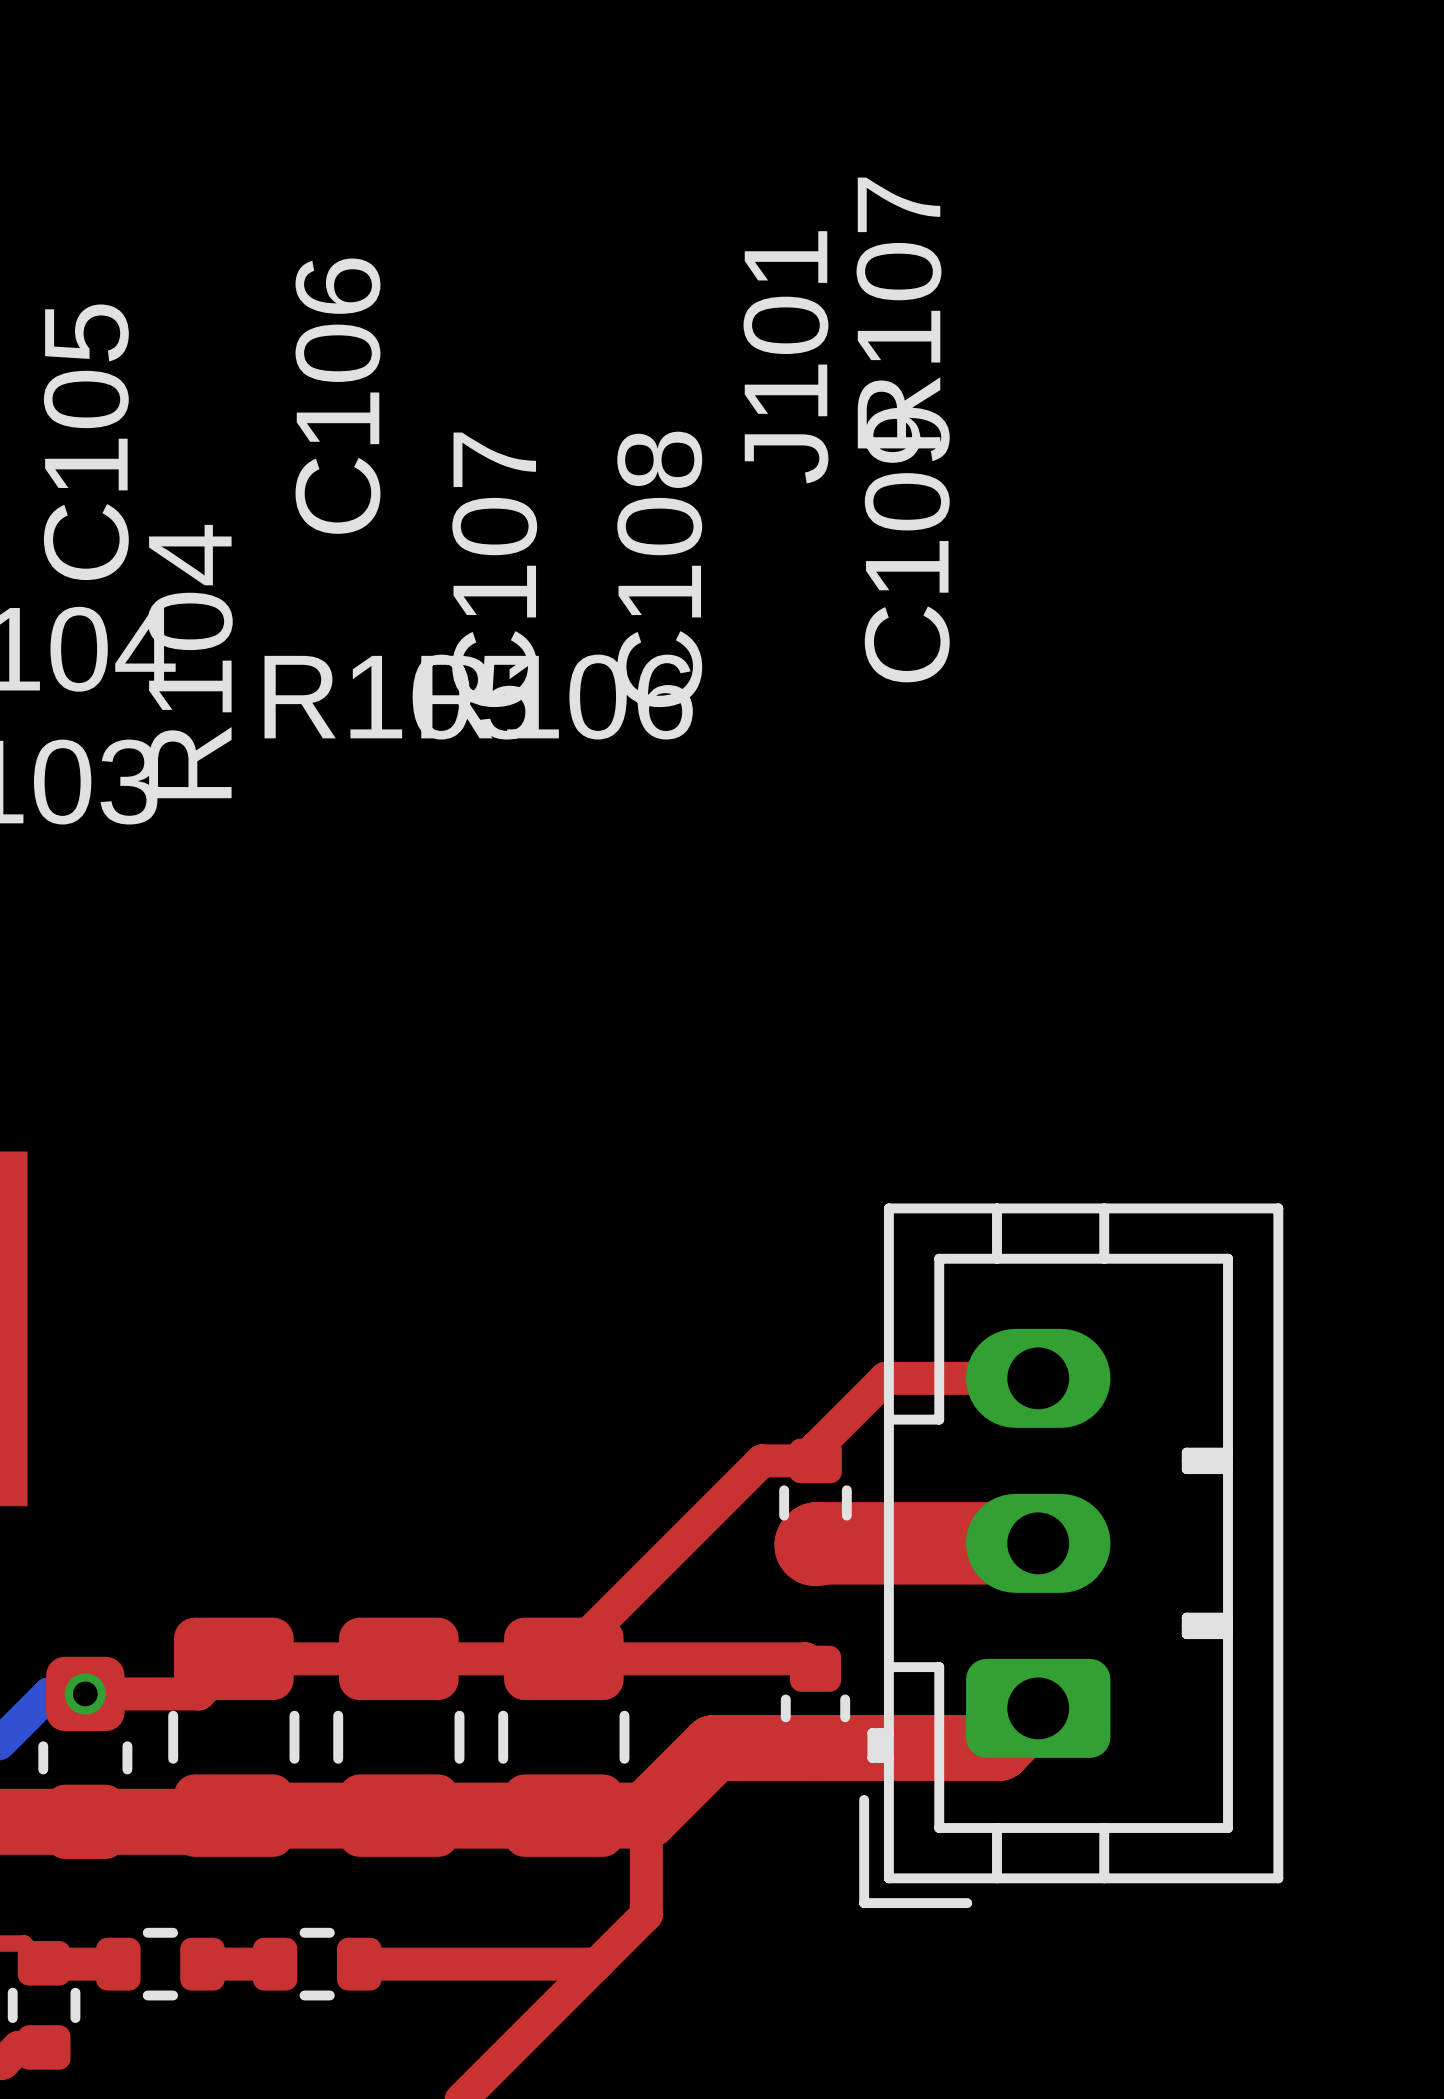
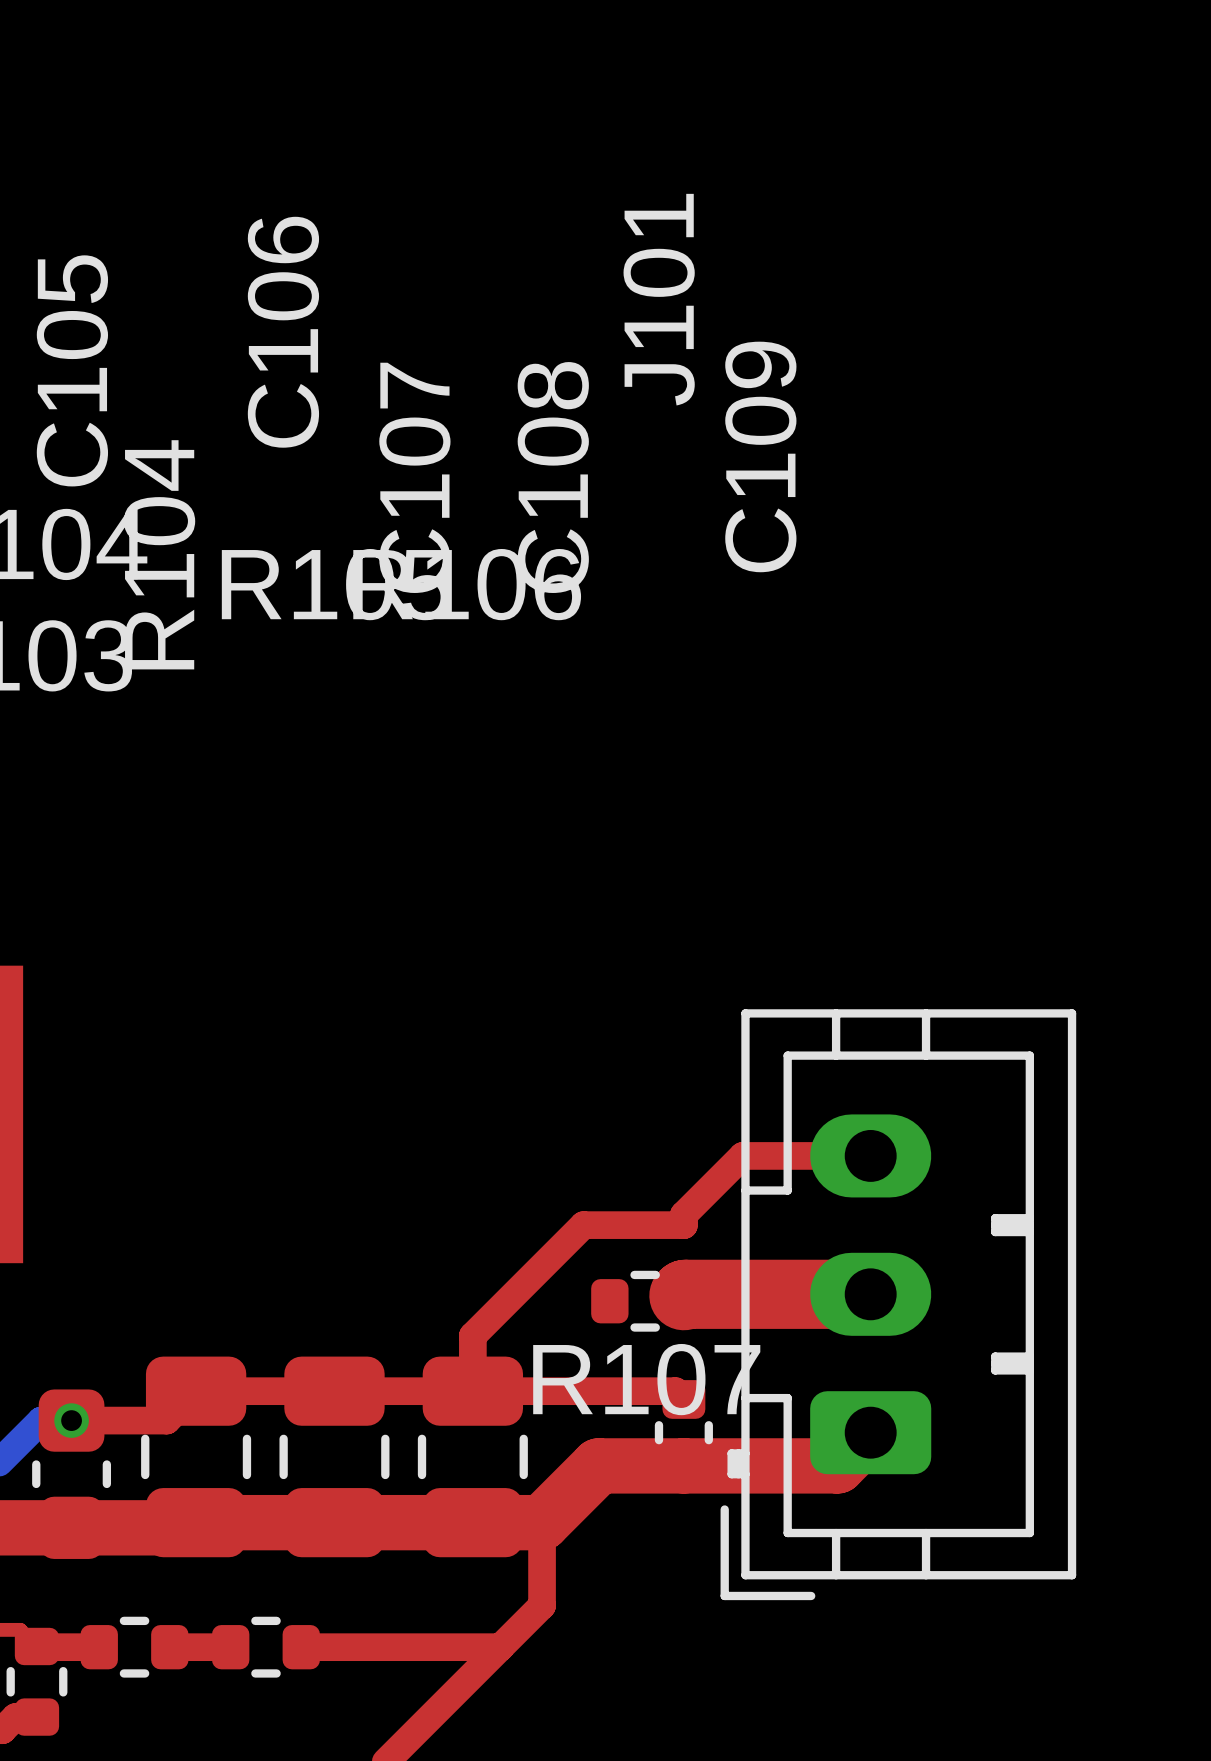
R107 name position: R107 (899, 313) -> R107 (646, 1379)
top track: (761, 1460) (563, 1658) -> (638, 1225) (583, 1225) (472, 1335) (472, 1391)
R107 rotation: 0° (815, 1502) -> 90° clockwise (645, 1301)

